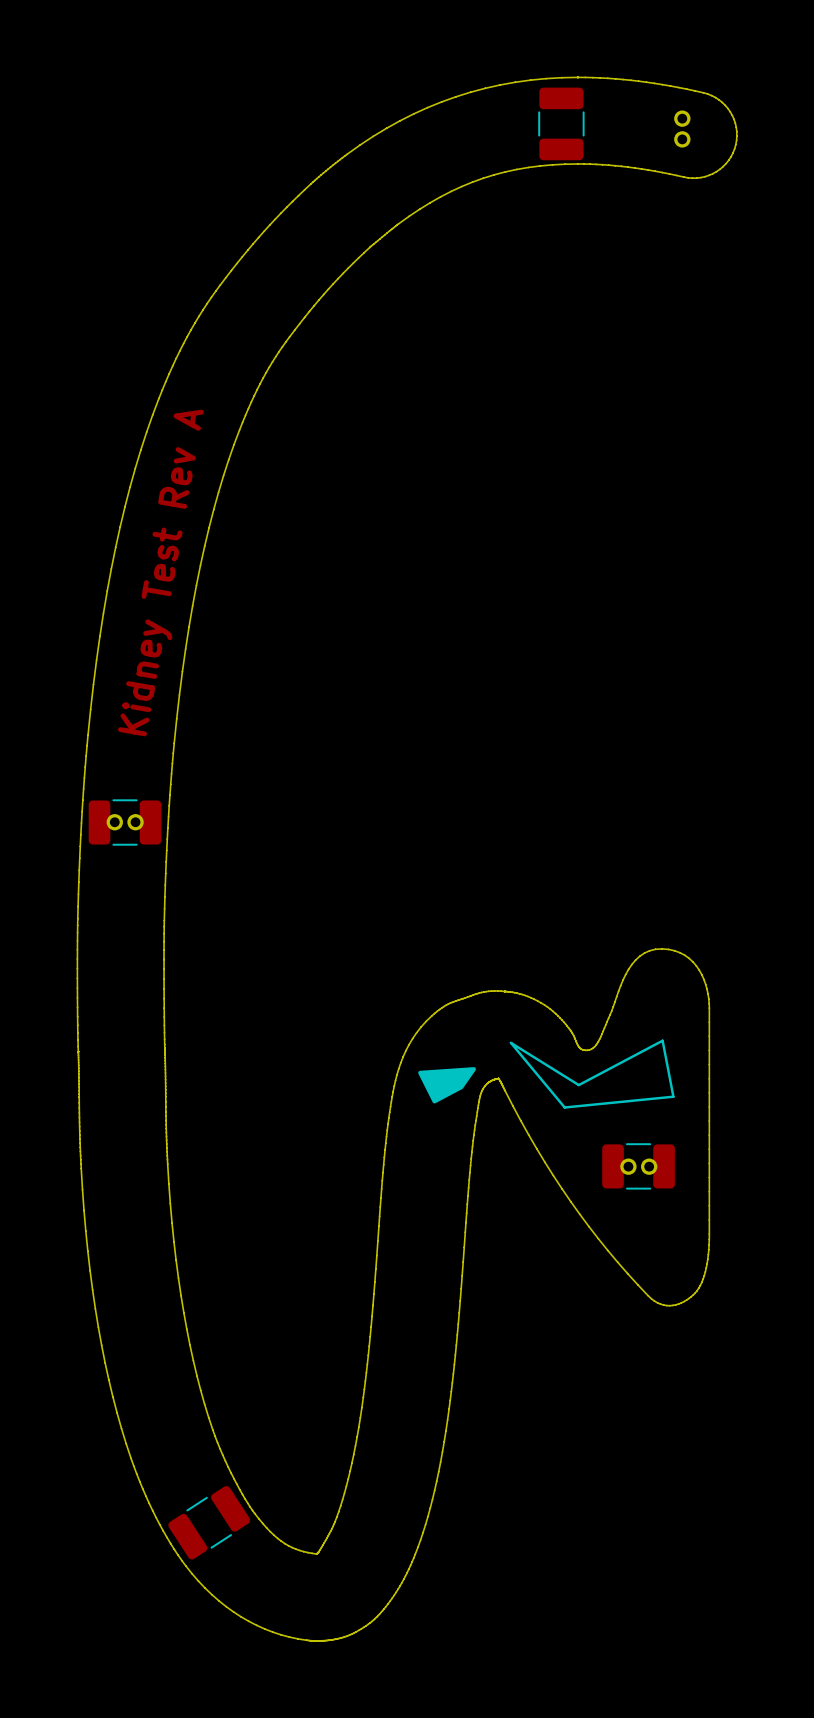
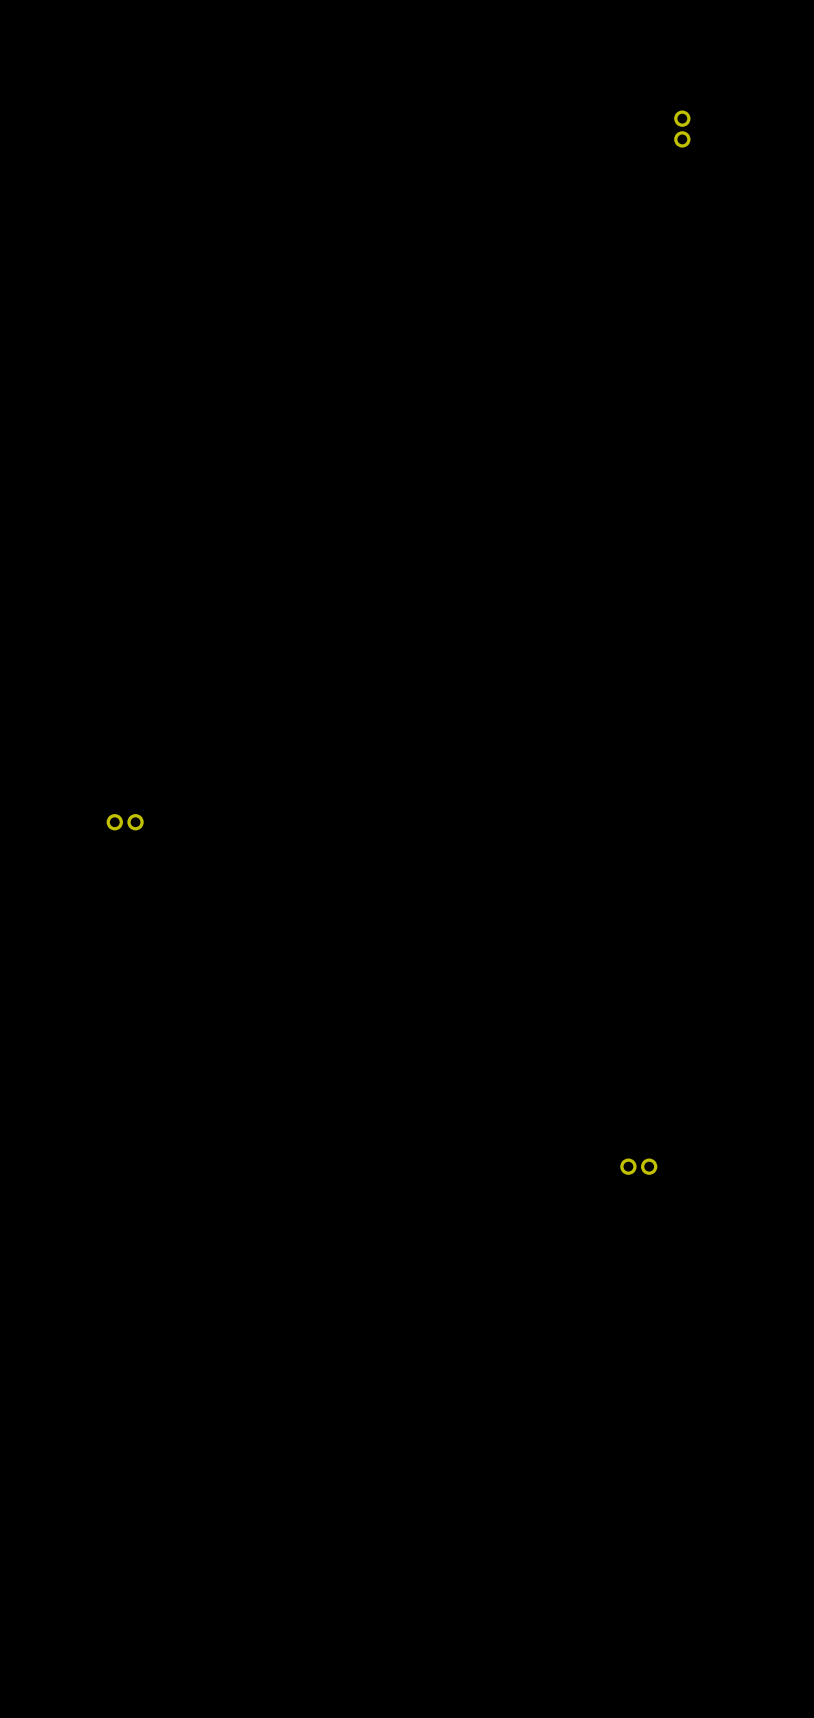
part: (561, 123) -> none
text: Kidney Test Rev A (160, 573) -> none
part: (125, 822) -> none
line: (510, 1042) (578, 1085) (662, 1040) (673, 1096) (564, 1107) (511, 1043) -> none
drawing: [418, 1067, 476, 1104] -> none
board edge: (493, 1079) (483, 1088) (478, 1105) (471, 1158) (457, 1334) (447, 1420) (432, 1499) (413, 1558) (400, 1586) (385, 1606) (371, 1621) (352, 1633) (334, 1639) (313, 1640) (289, 1637) (264, 1629) (226, 1606) (198, 1581) (174, 1549) (152, 1510) (133, 1466) (117, 1412) (101, 1345) (90, 1270) (82, 1189) (79, 1126) (77, 949) (80, 834) (88, 735) (99, 636) (115, 547) (130, 487) (146, 432) (162, 389) (183, 343) (203, 309) (231, 270) (269, 225) (310, 183) (346, 154) (386, 128) (427, 107) (470, 92) (500, 84) (546, 78) (577, 77) (623, 79) (670, 86) (711, 95) (722, 102) (730, 112) (736, 127) (736, 140) (733, 152) (723, 166) (709, 175) (692, 178) (641, 168) (602, 164) (565, 164) (528, 167) (494, 174) (472, 182) (440, 196) (409, 216) (370, 247) (338, 278) (304, 317) (275, 356) (257, 389) (239, 430) (223, 475) (209, 527) (192, 605) (182, 671) (173, 753) (166, 850) (164, 950) (166, 1120) (173, 1241) (181, 1295) (193, 1360) (208, 1417) (225, 1461) (247, 1503) (270, 1531) (292, 1547) (316, 1554) -> none
board edge: (499, 1079) (536, 1148) (570, 1201) (607, 1250) (648, 1295) (660, 1304) (675, 1304) (693, 1294) (703, 1279) (707, 1263) (709, 1239) (709, 1003) (703, 979) (692, 961) (679, 952) (668, 949) (655, 949) (639, 956) (625, 974) (598, 1041) (589, 1049) (583, 1050) (579, 1047) (568, 1027) (550, 1009) (534, 999) (519, 993) (501, 991) (483, 992) (452, 1002) (439, 1009) (421, 1027) (409, 1044) (400, 1062) (394, 1086) (385, 1150) (370, 1336) (358, 1427) (340, 1505) (331, 1528) (317, 1553) -> none
part: (638, 1166) -> none
part: (209, 1522) -> none

